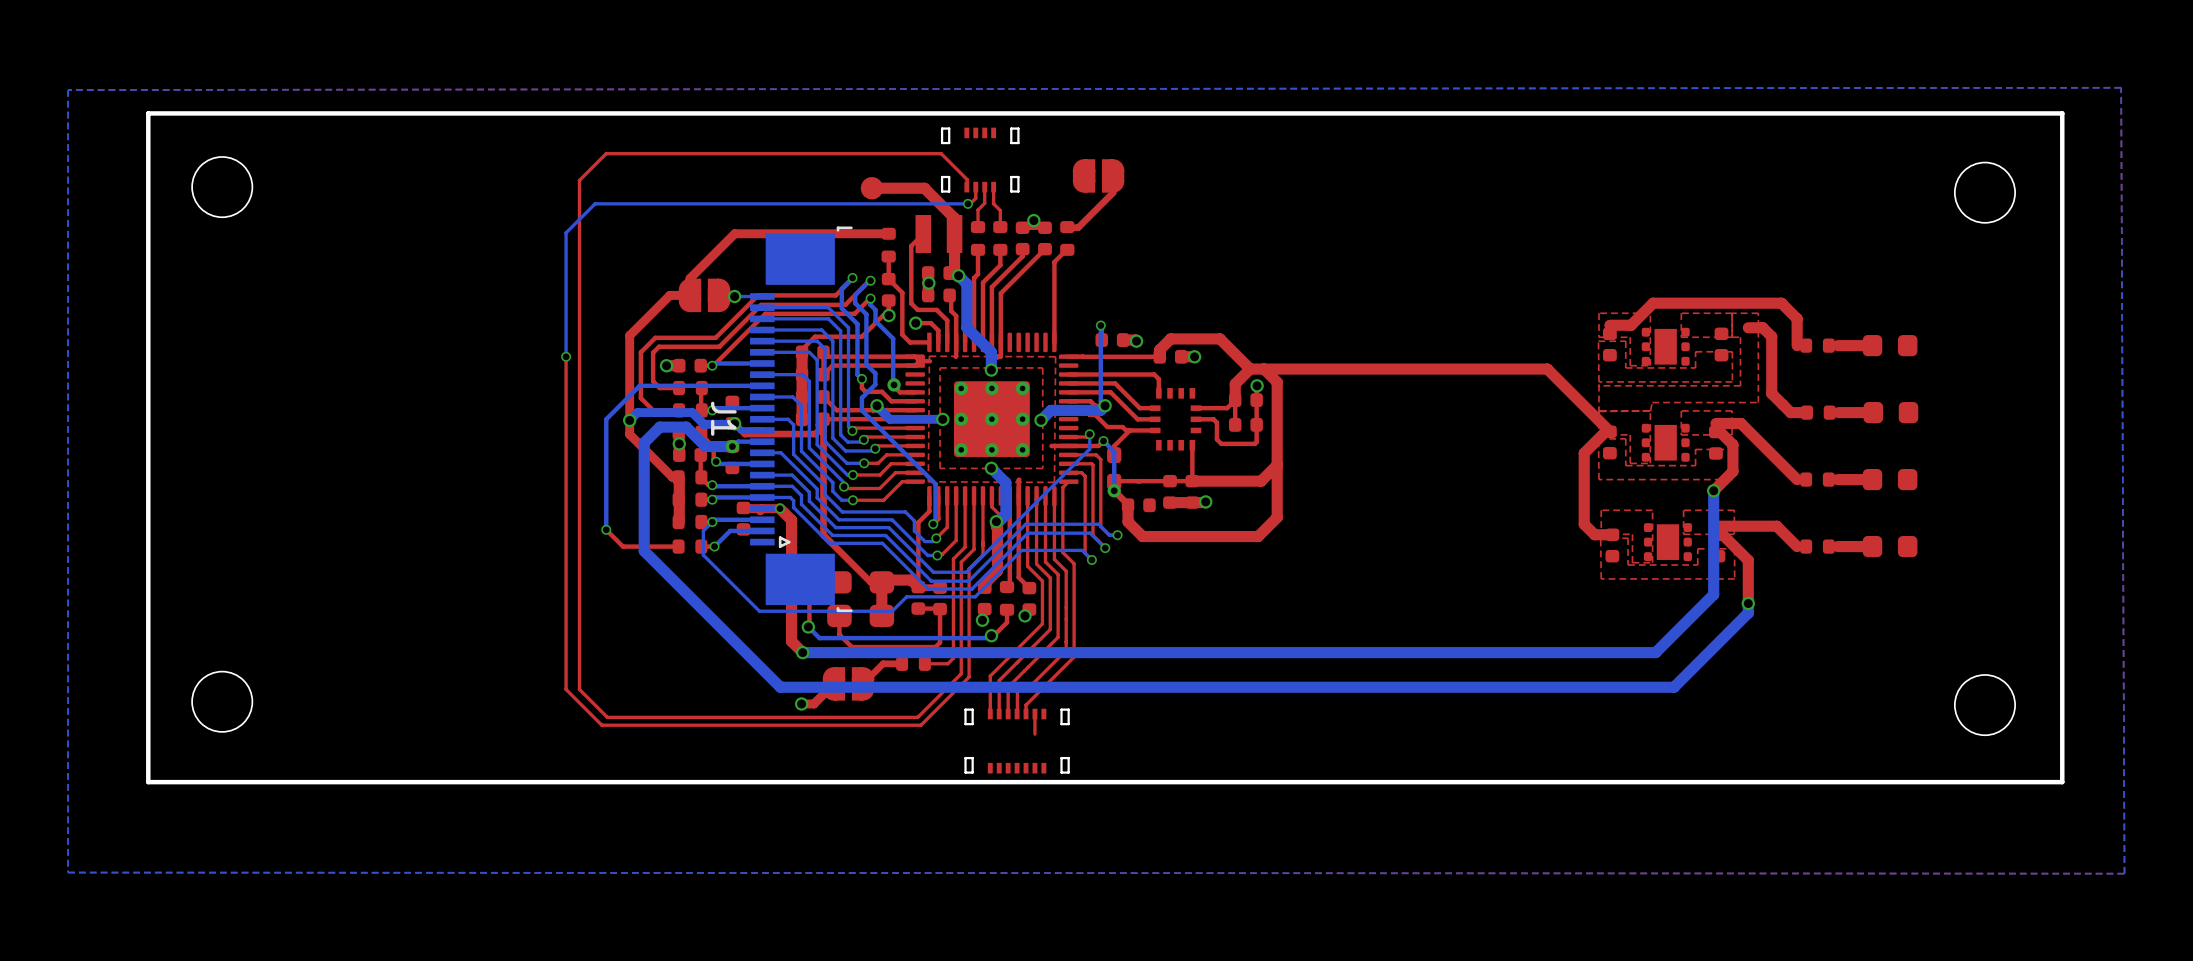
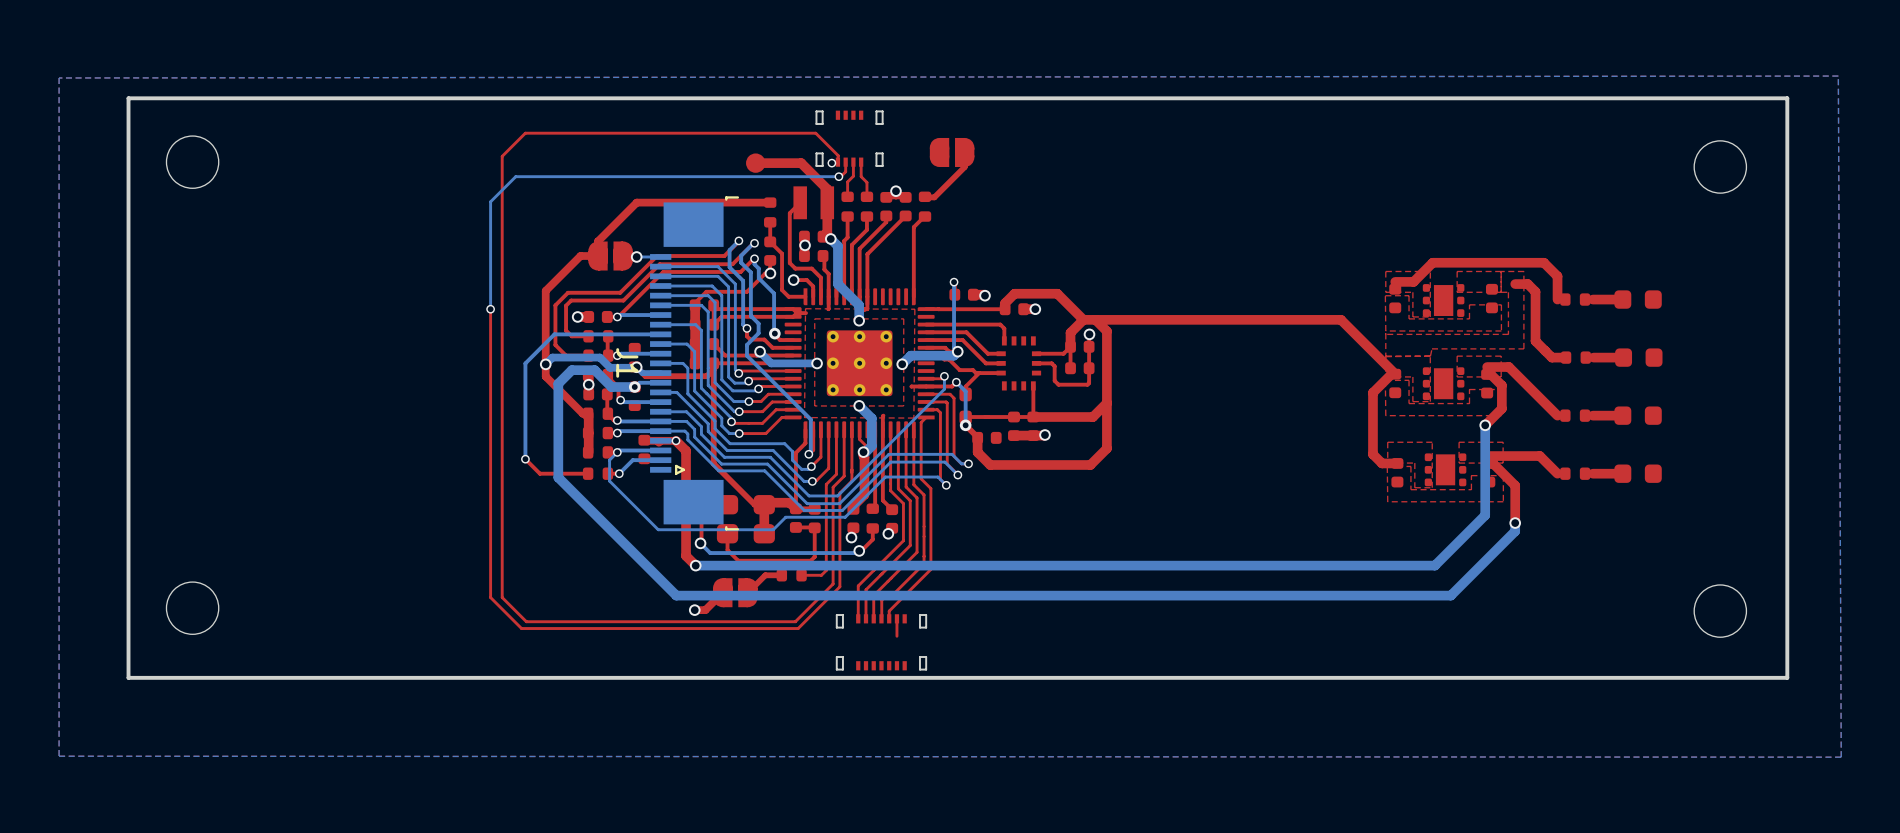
via: none -> (831, 163)

